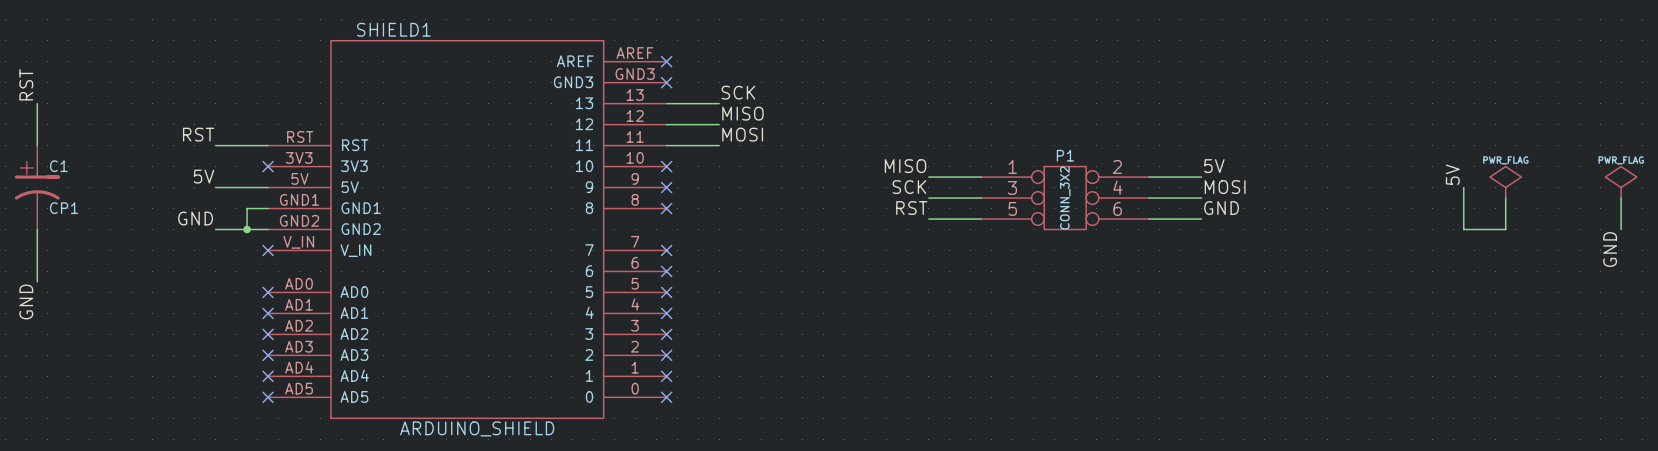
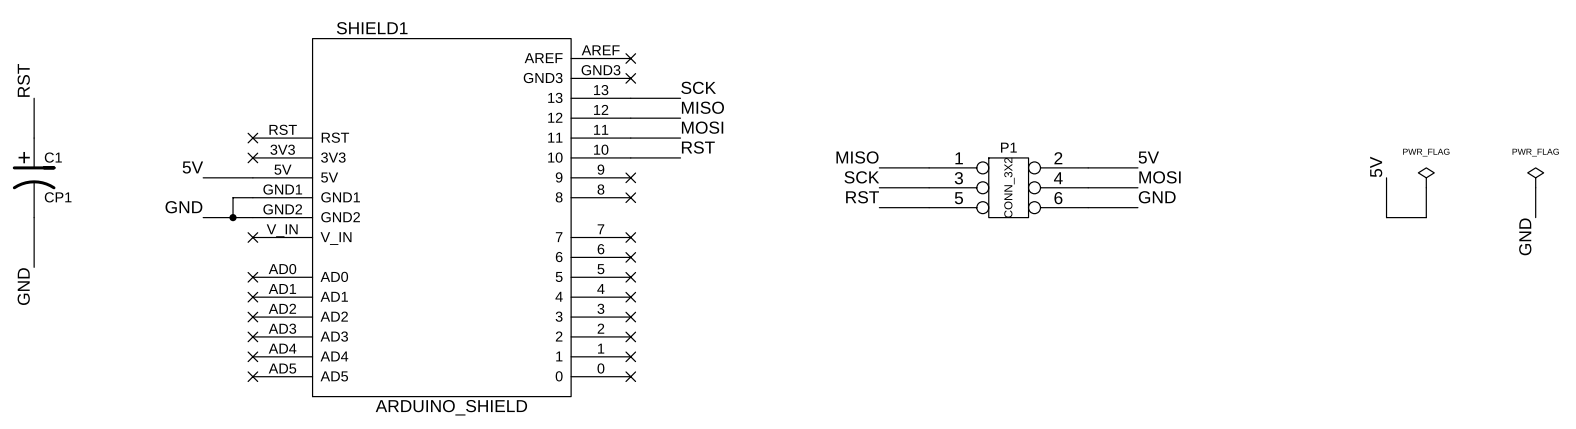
label: RST (198, 134) -> none
wire: (215, 145) (268, 145) -> none
no-connect mark: none -> (252, 138)
label: none -> RST (698, 147)
wire: none -> (630, 157) (680, 157)
no-connect mark: (666, 166) -> none
power symbol shape: [1489, 166, 1522, 199] -> [1418, 167, 1435, 188]
power symbol shape: [1605, 166, 1637, 199] -> [1527, 167, 1544, 188]

